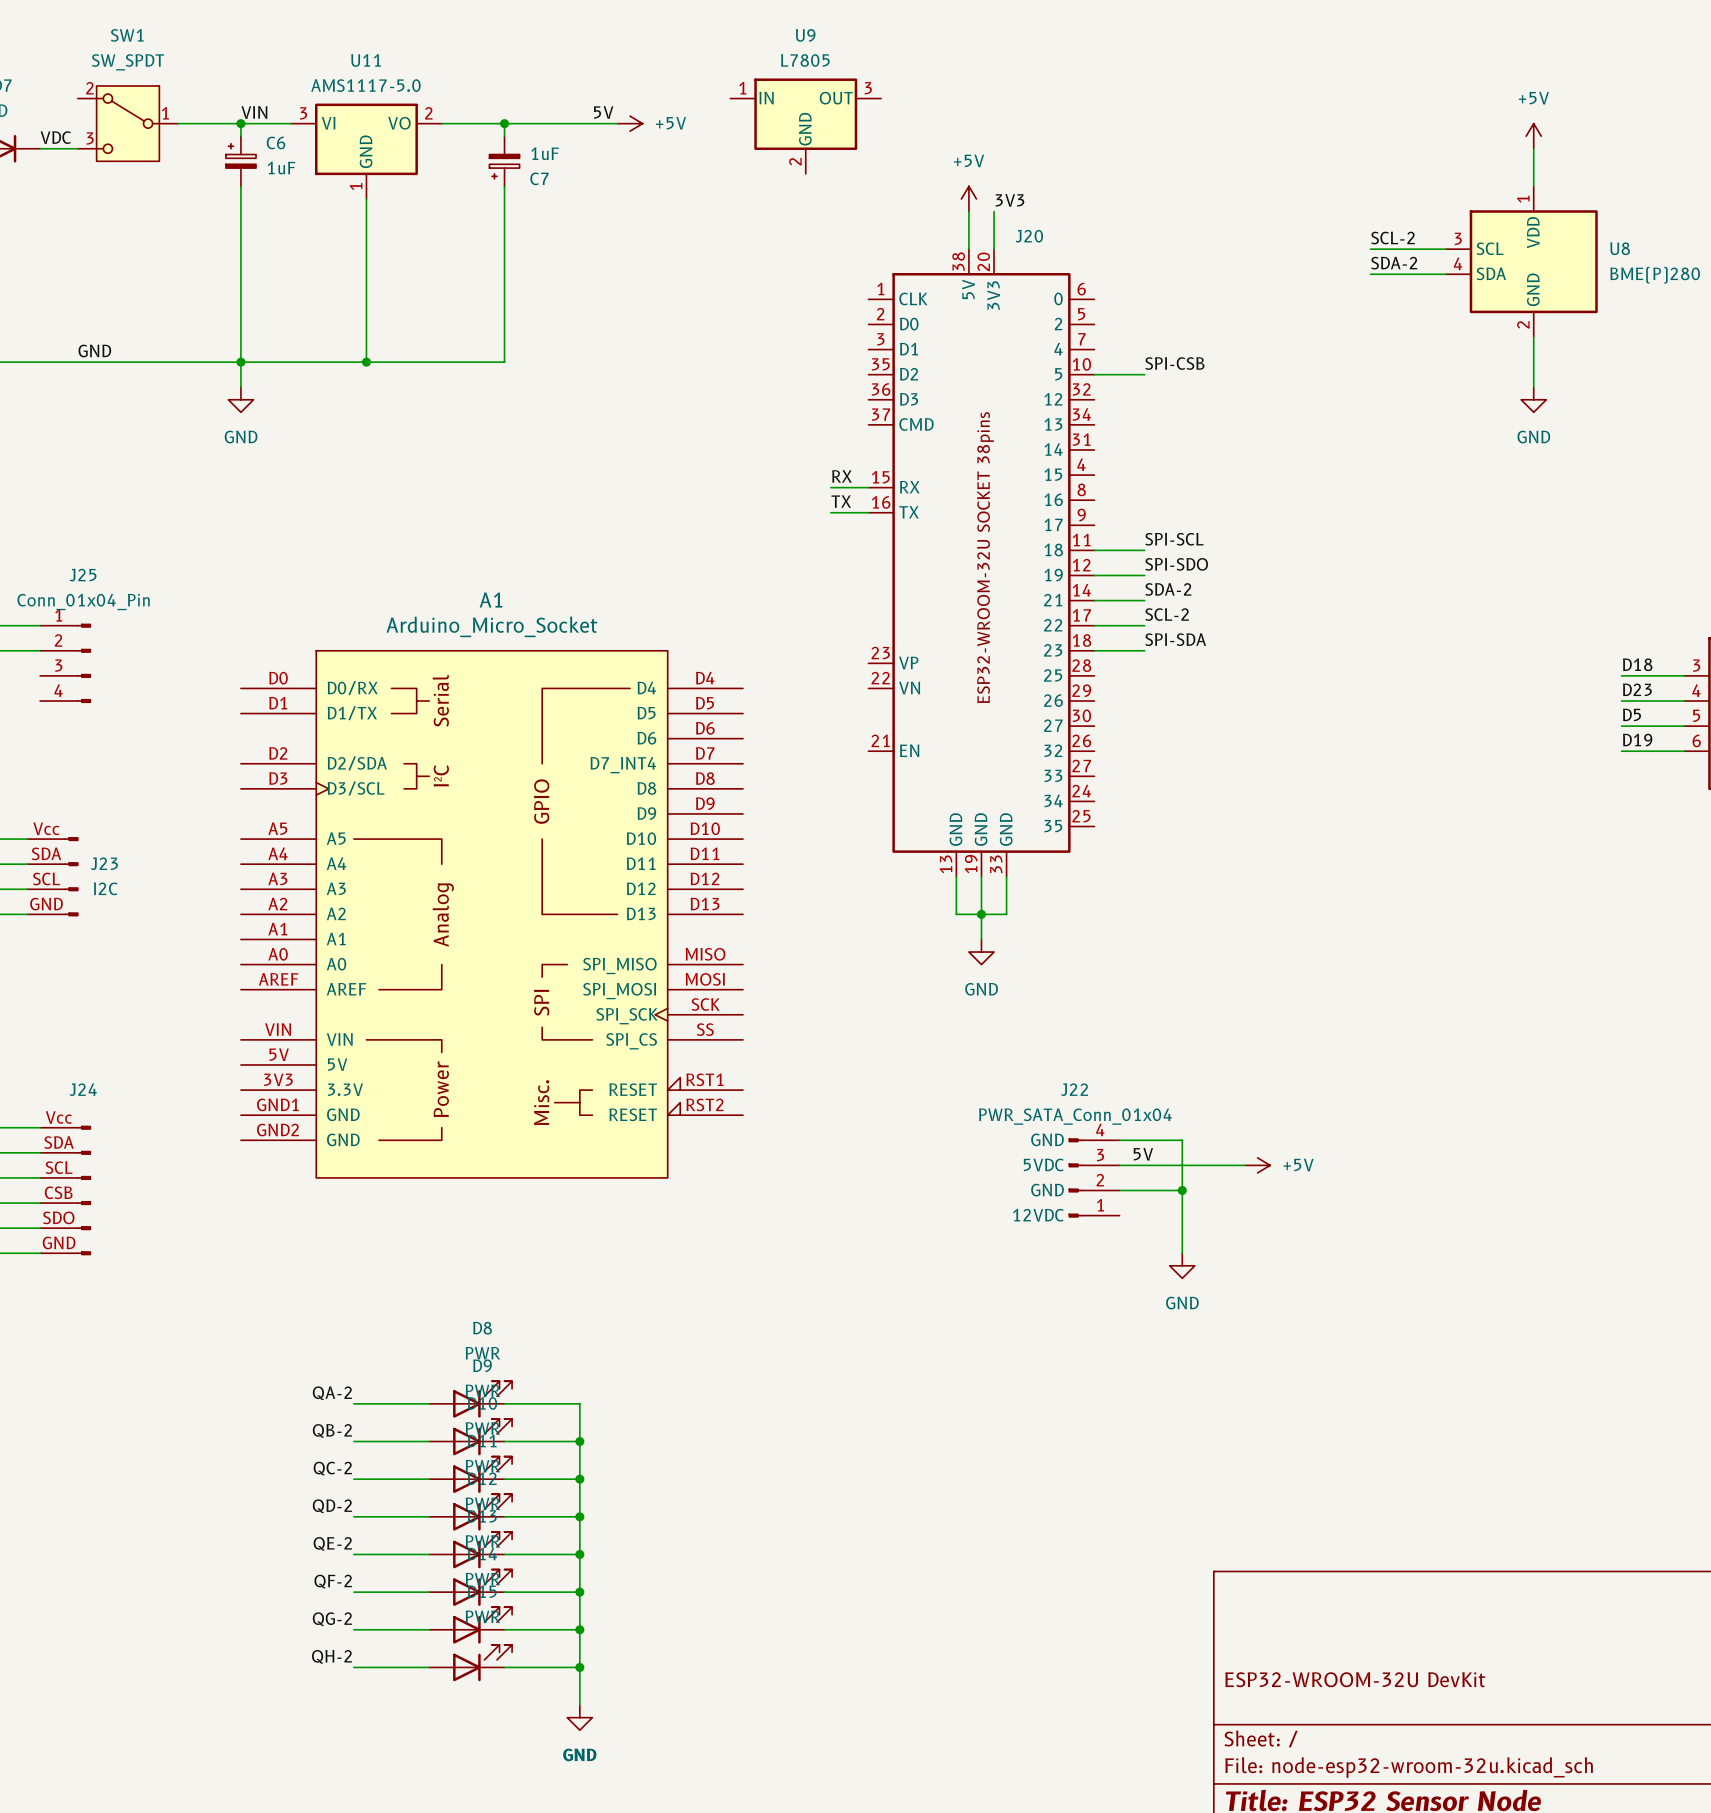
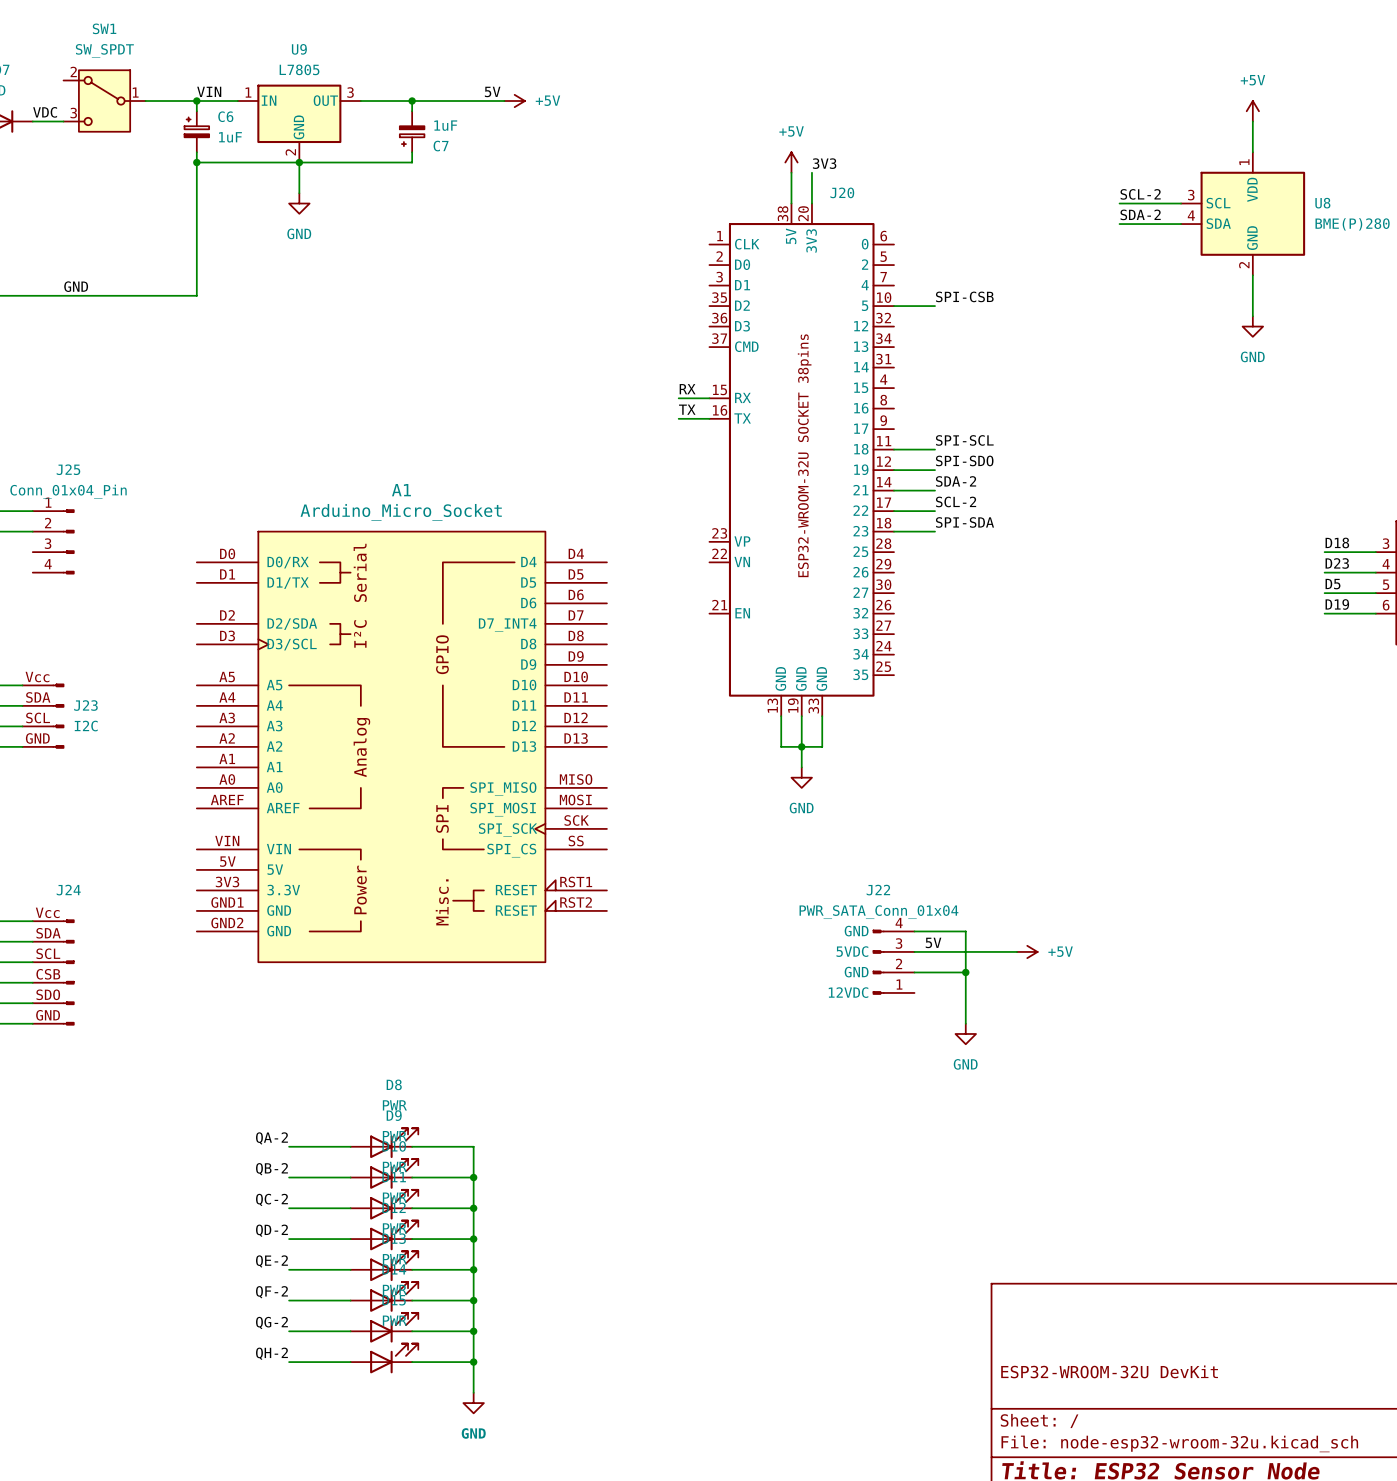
U9 position: (805, 126) -> (299, 123)
U11: AMS1117-5.0 (366, 151) -> none
junction: none -> (196, 162)
junction: none -> (299, 162)
wire: (504, 198) (504, 362) (240, 362) (240, 387) -> (412, 162) (196, 162)
wire: (366, 236) (366, 362) -> none
junction: (240, 362) -> none
junction: (366, 362) -> none
power symbol position: GND (240, 399) -> GND (299, 203)

